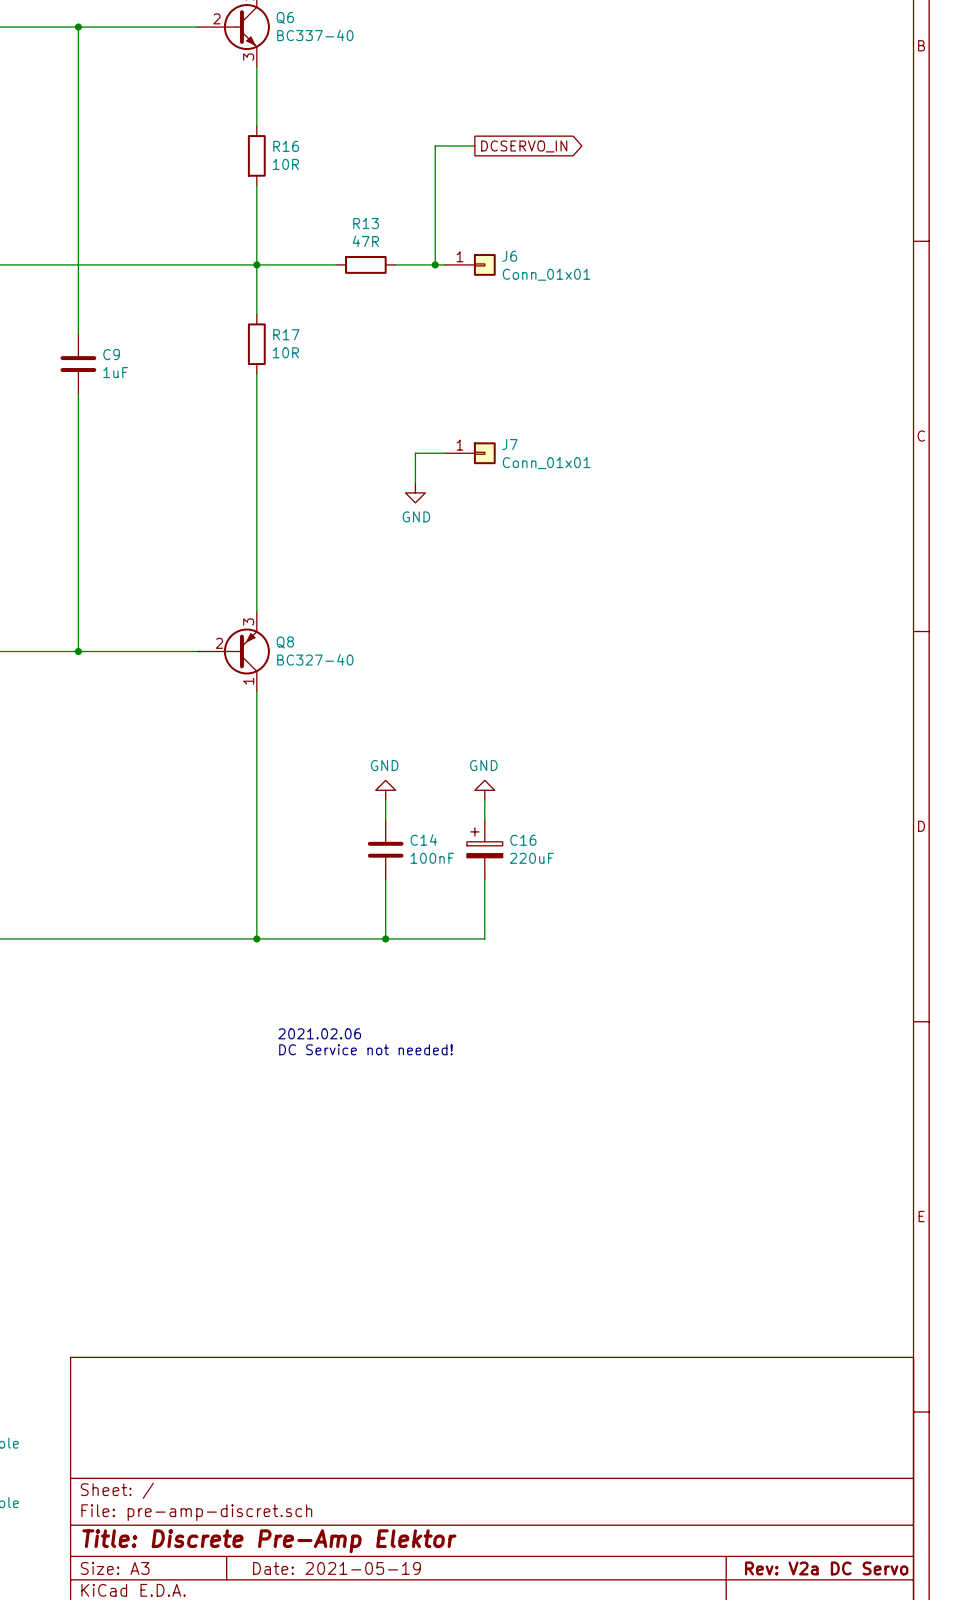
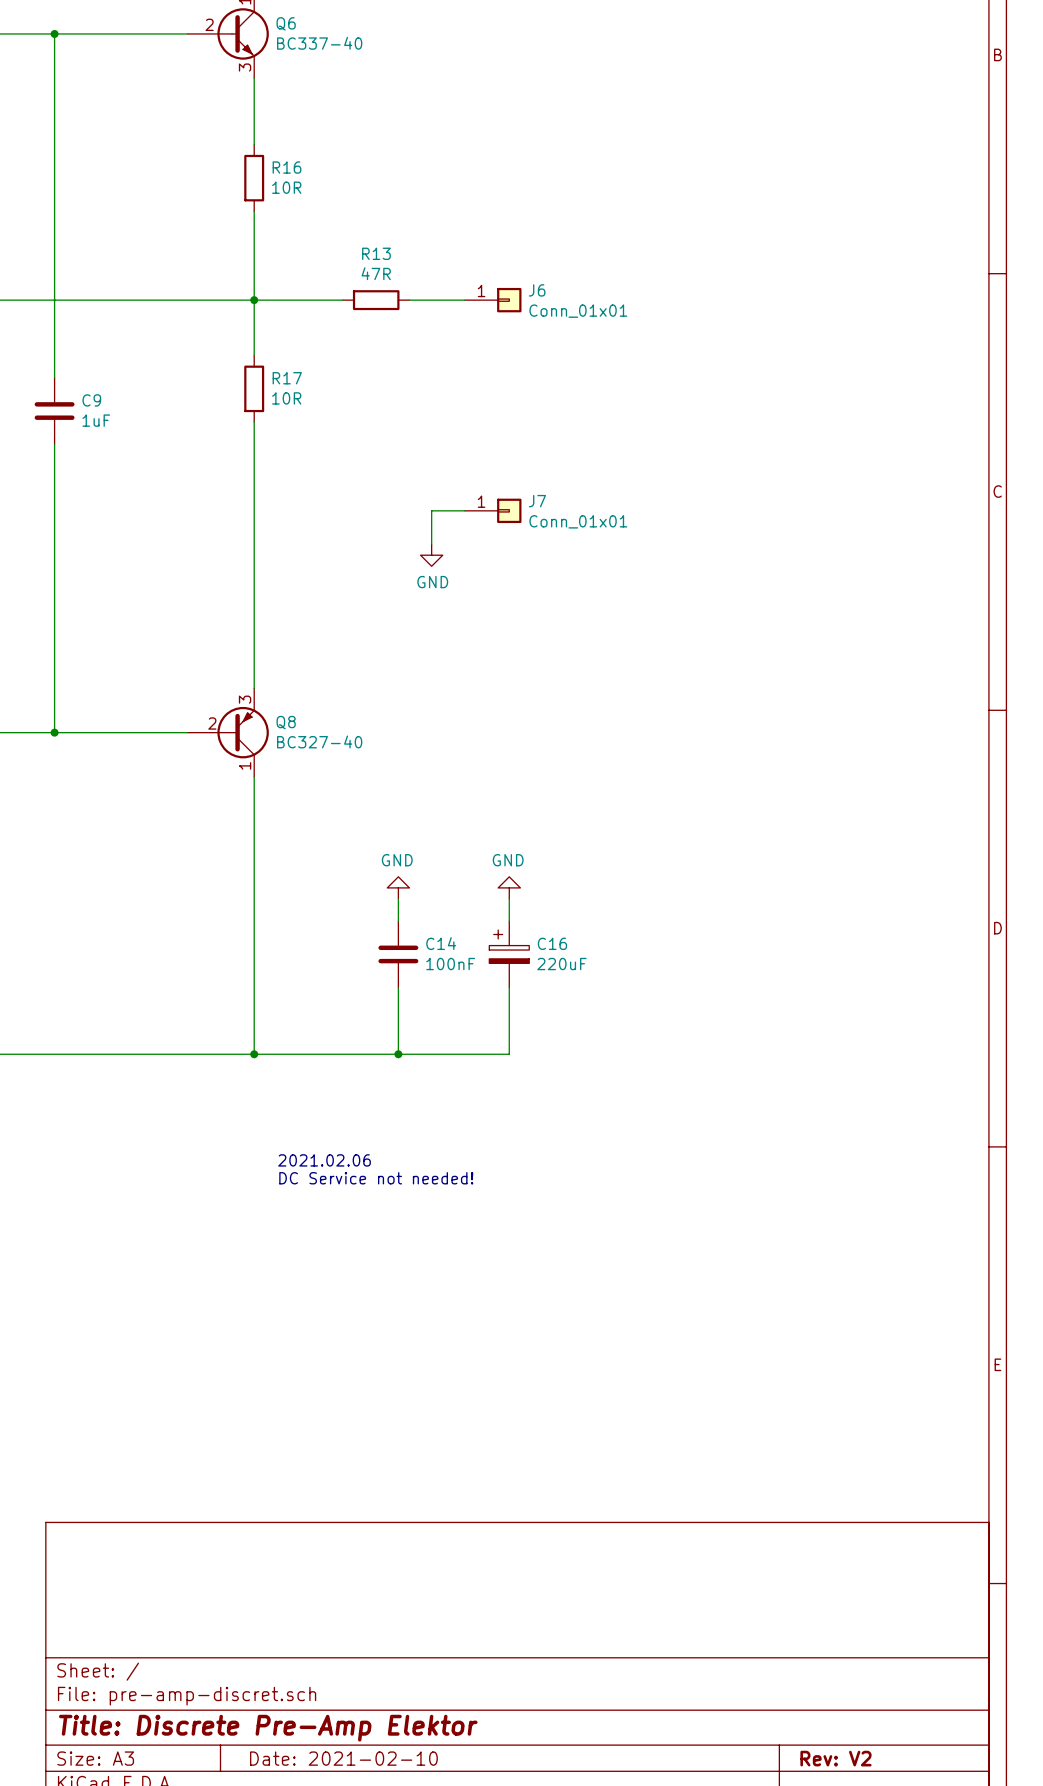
wire: (474, 145) (435, 145) (435, 264) -> none
global label: DCSERVO_IN (524, 146) -> none
junction: (435, 264) -> none
title block: Date: 2021-05-19 (337, 1568) -> Date: 2021-02-10 (343, 1758)
title block: Rev: V2a DC Servo (826, 1568) -> Rev: V2 (835, 1758)

